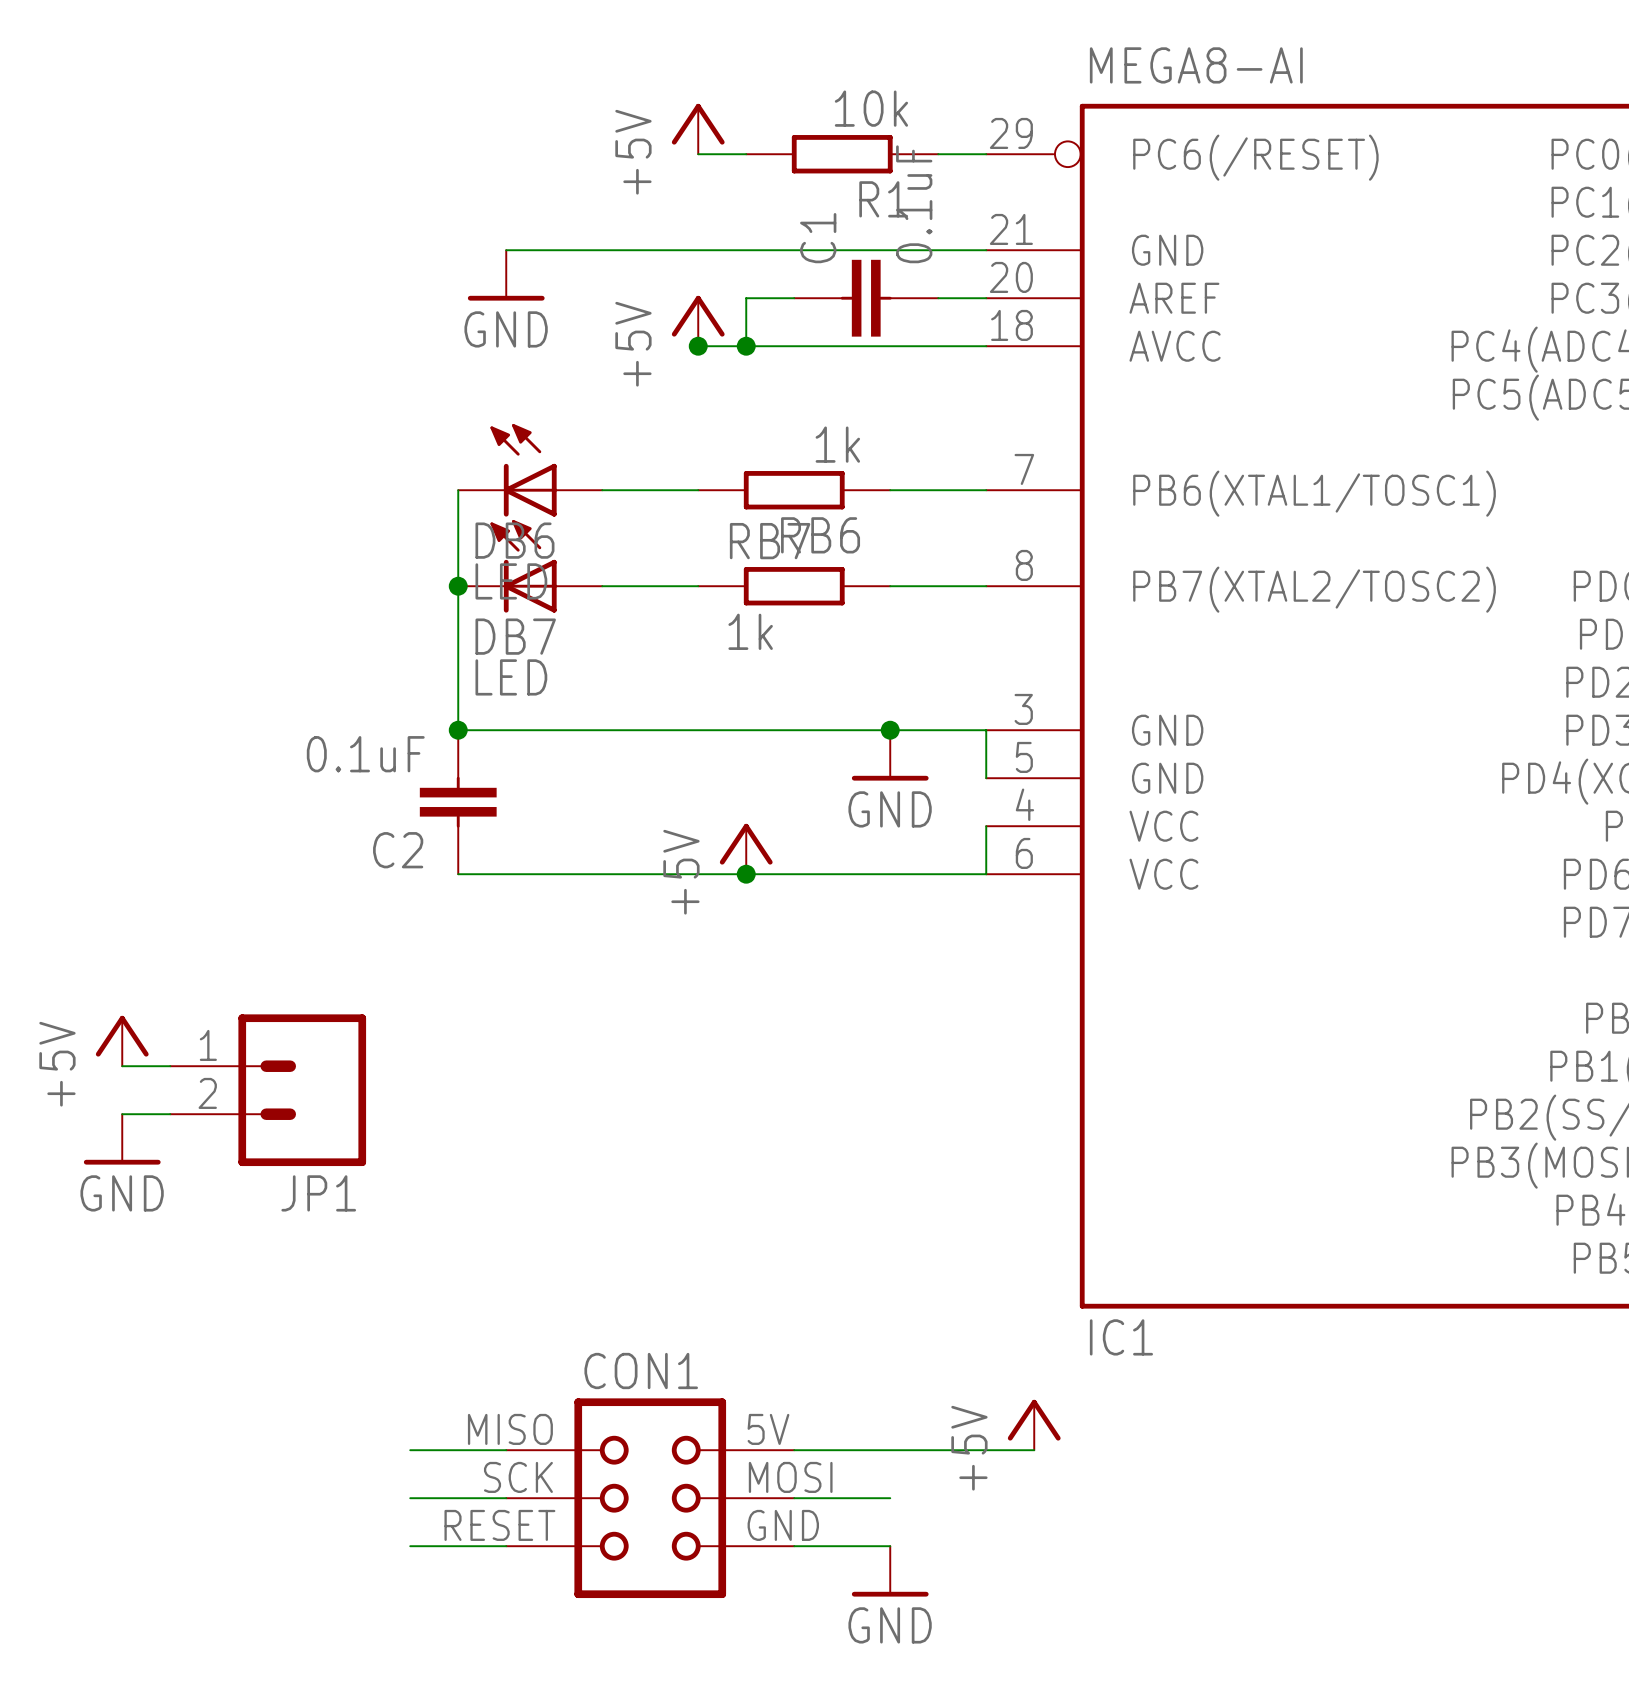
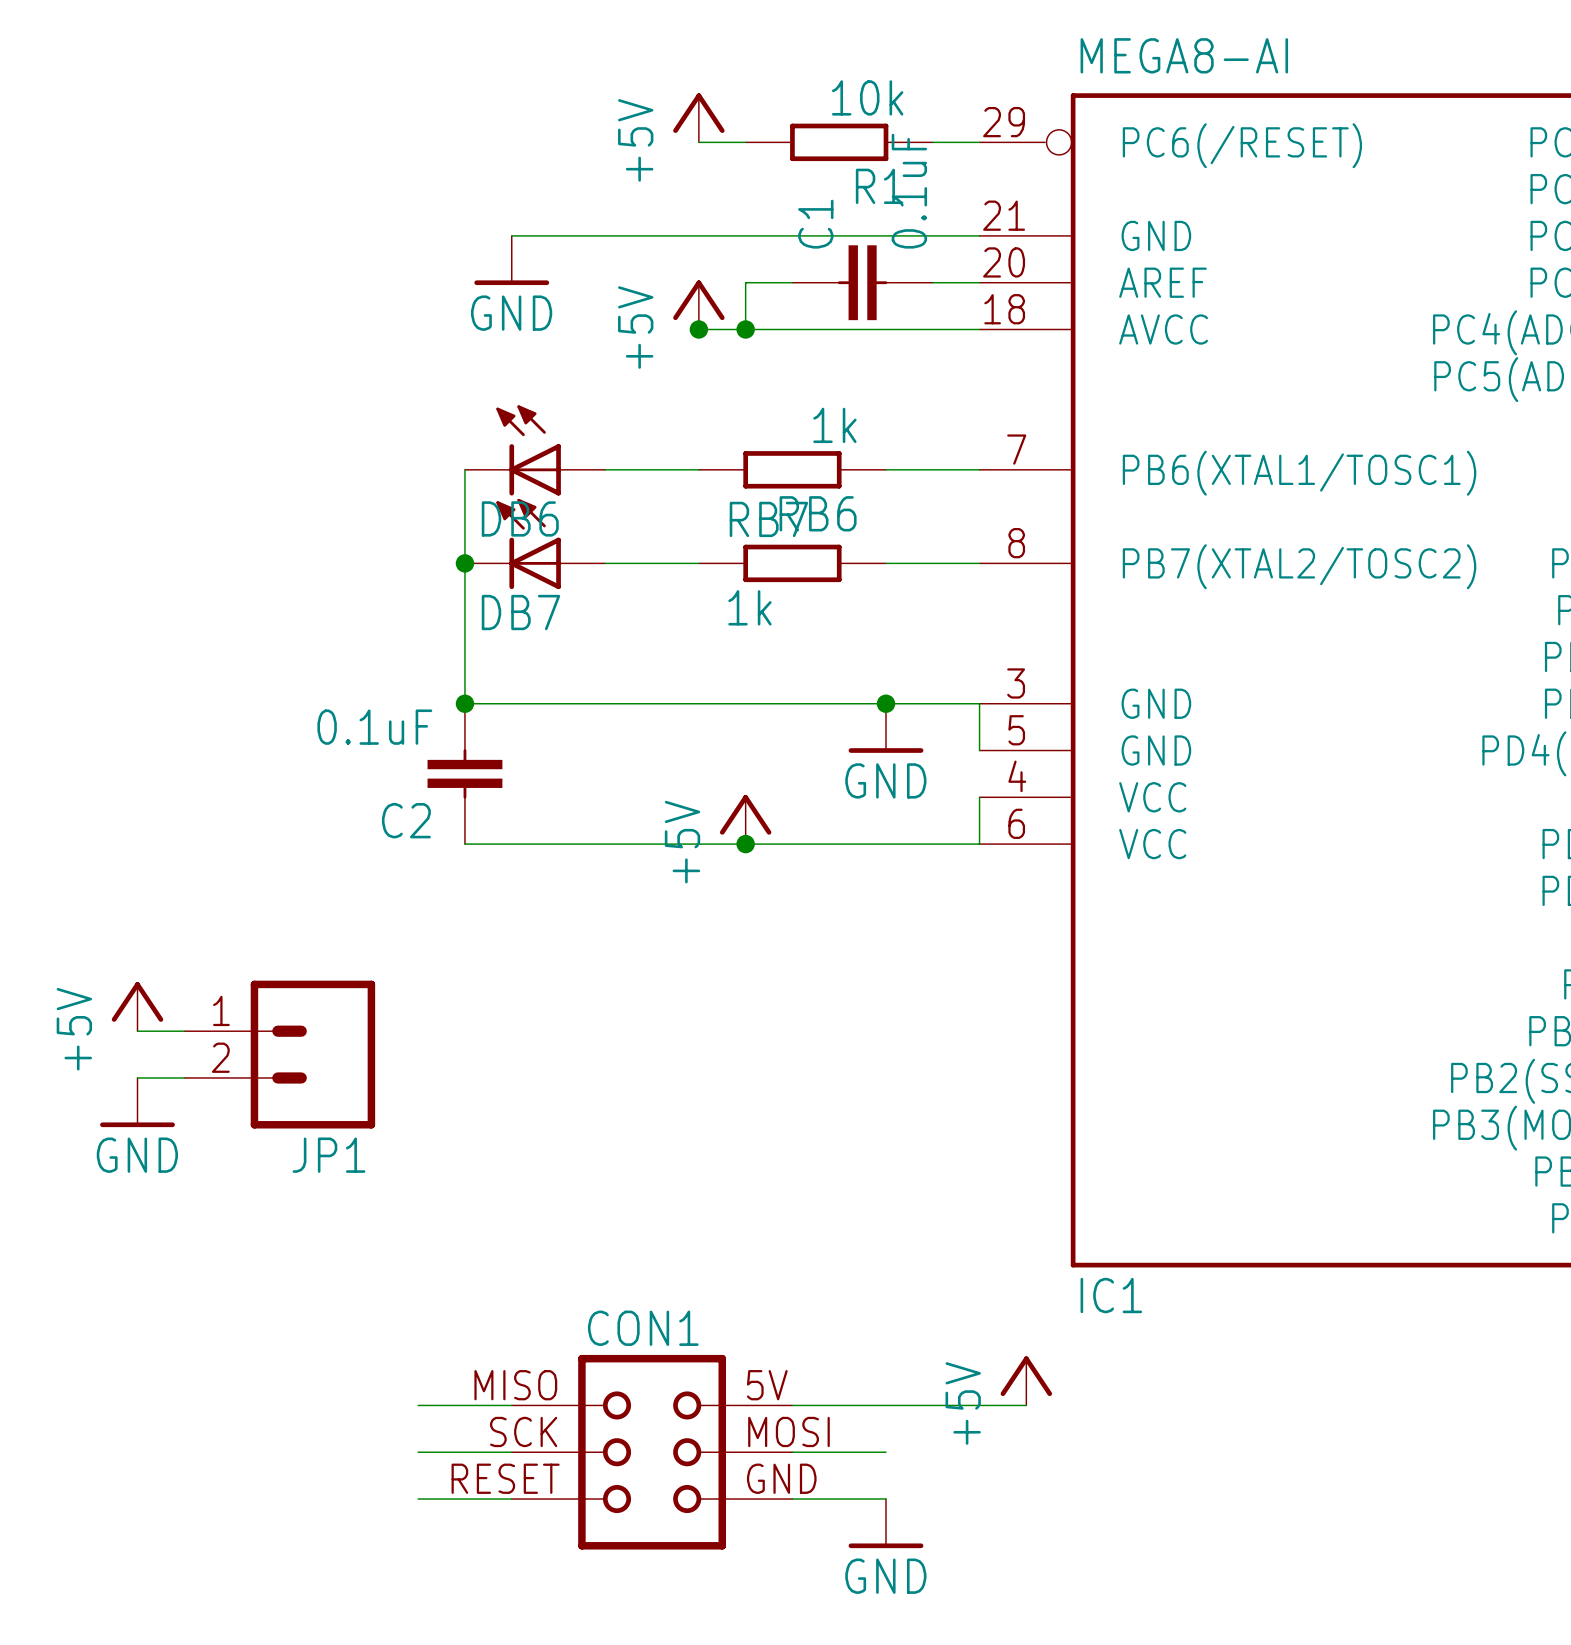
DB6 value: LED (511, 581) -> none
DB7 value: LED (511, 677) -> none

